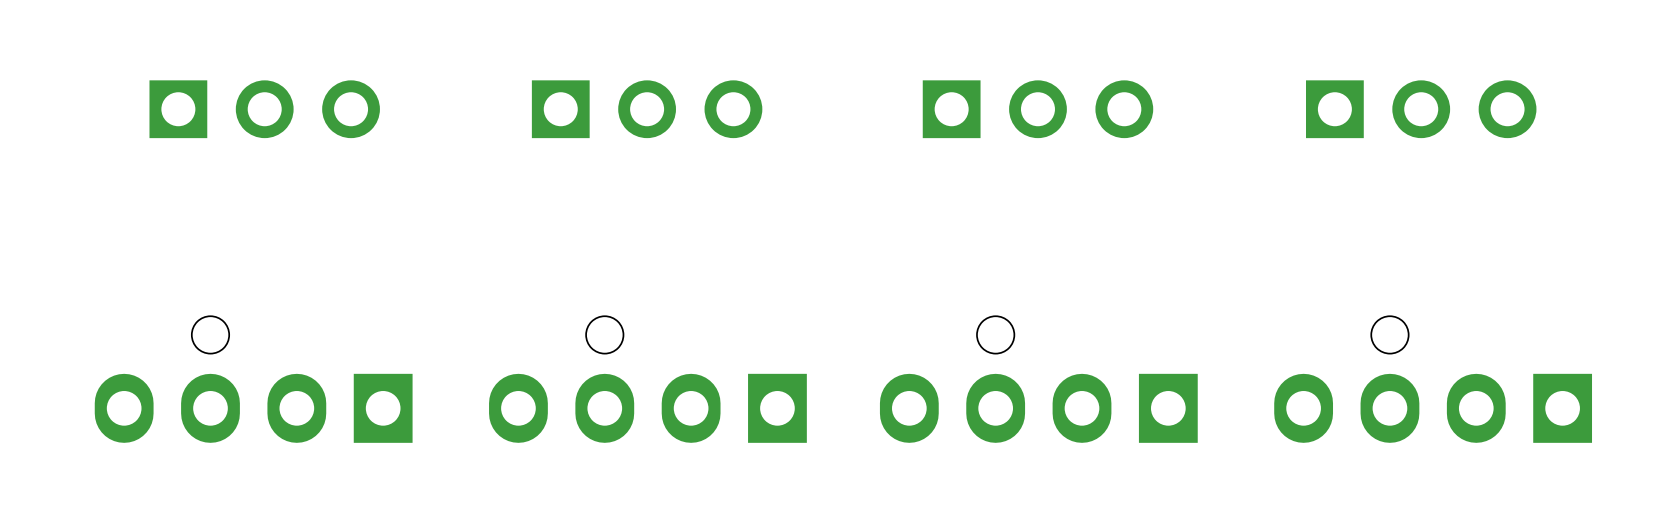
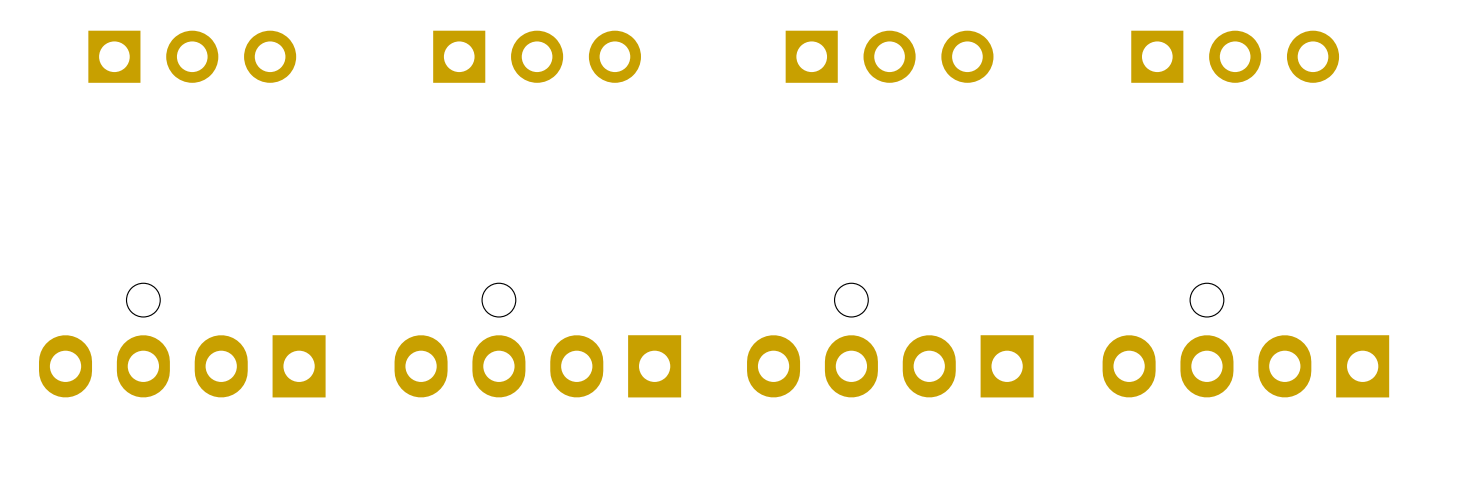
part position: (264, 109) -> (192, 56)
part position: (647, 109) -> (537, 56)
part position: (1037, 109) -> (889, 56)
part position: (1421, 109) -> (1235, 56)

